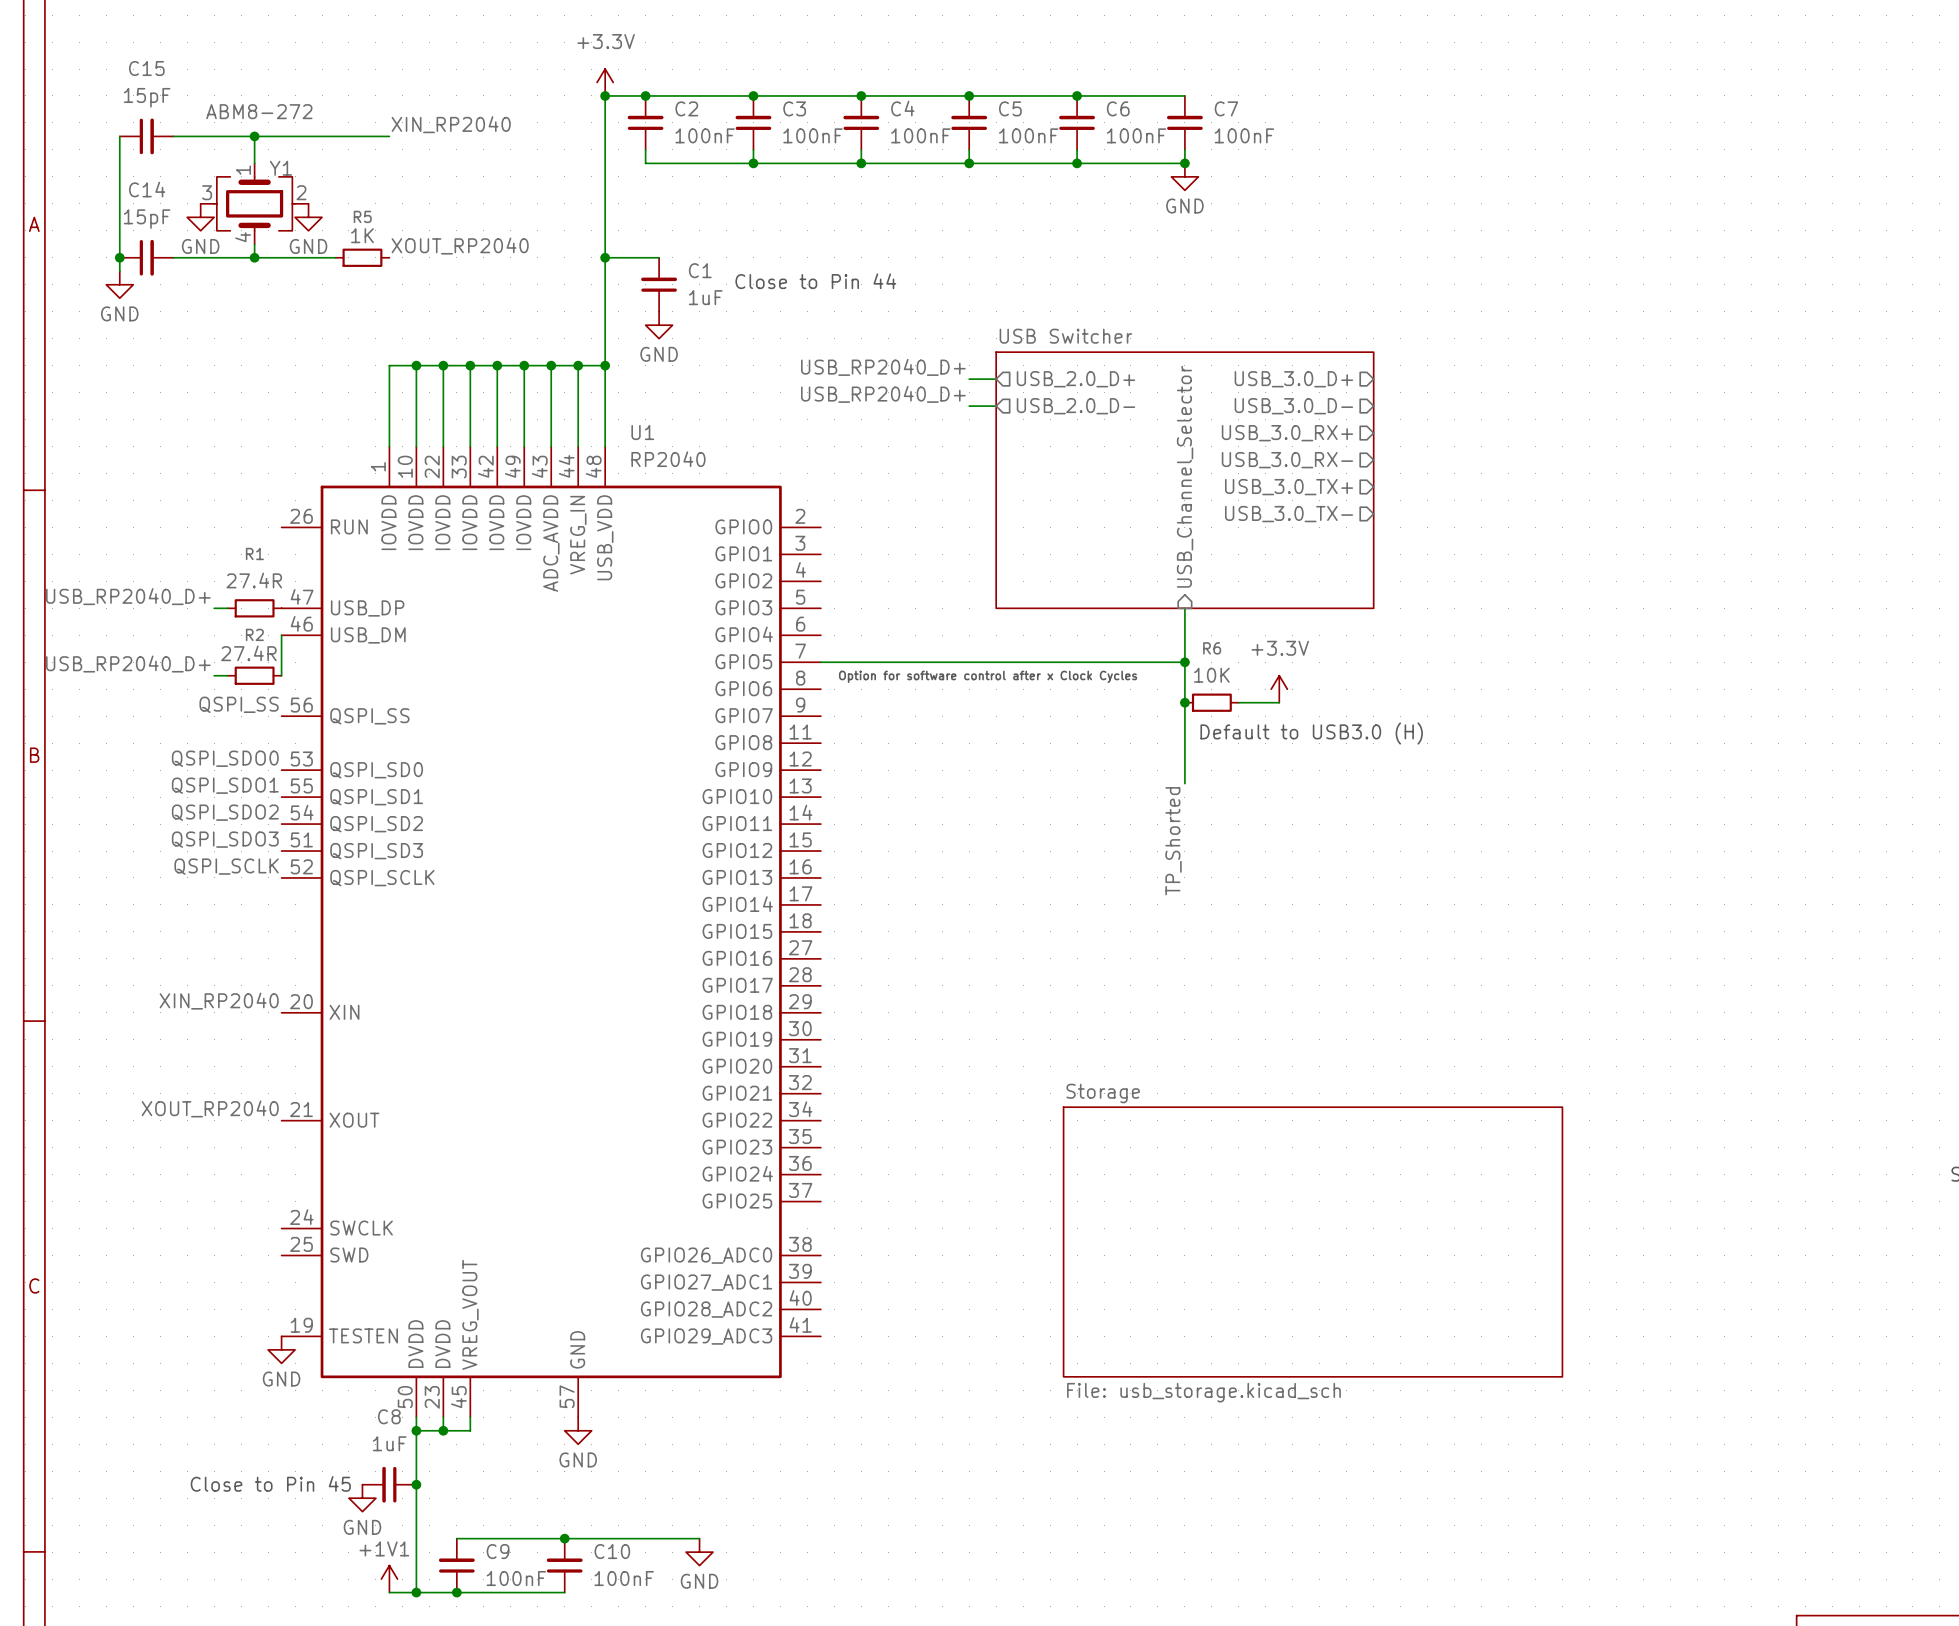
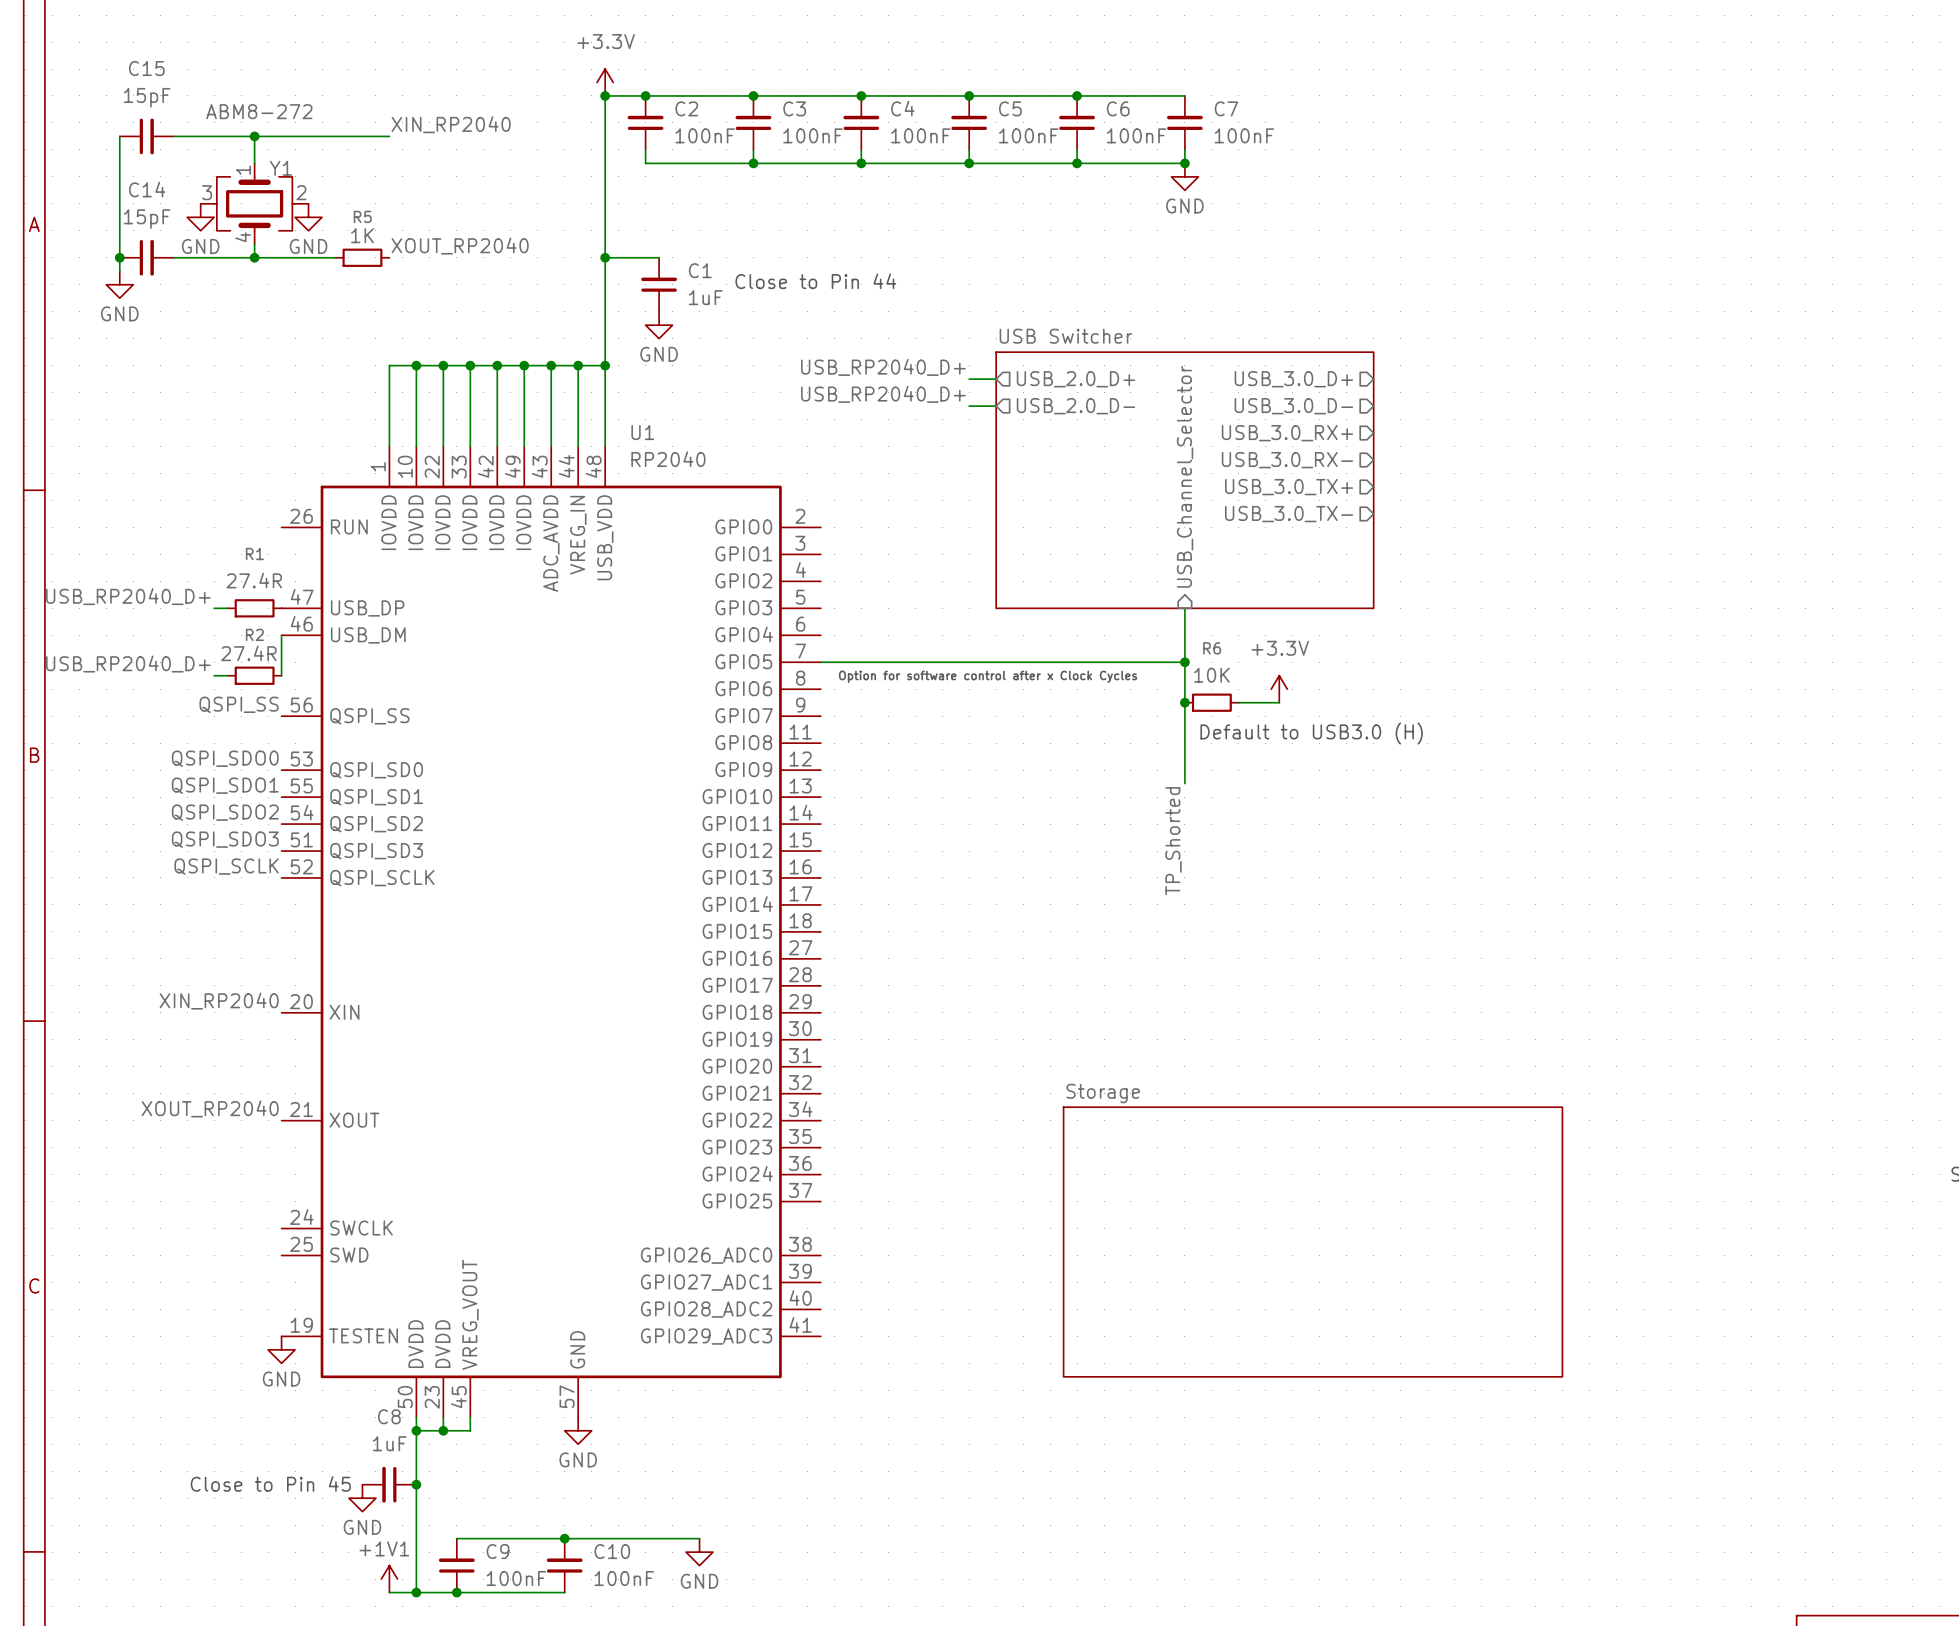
sheet Storage value: File: usb_storage.kicad_sch (1203, 1392) -> none

